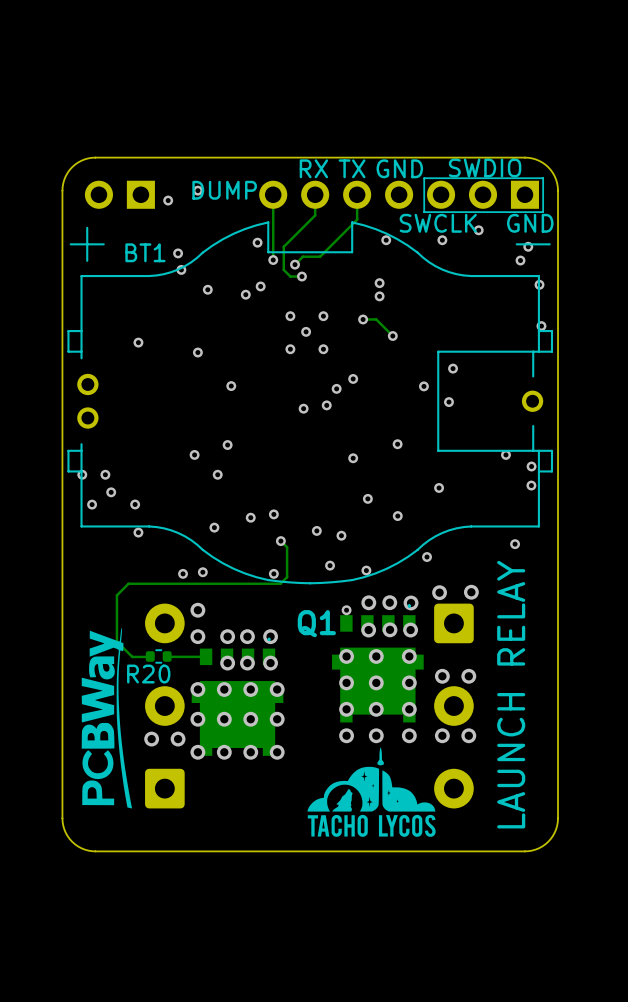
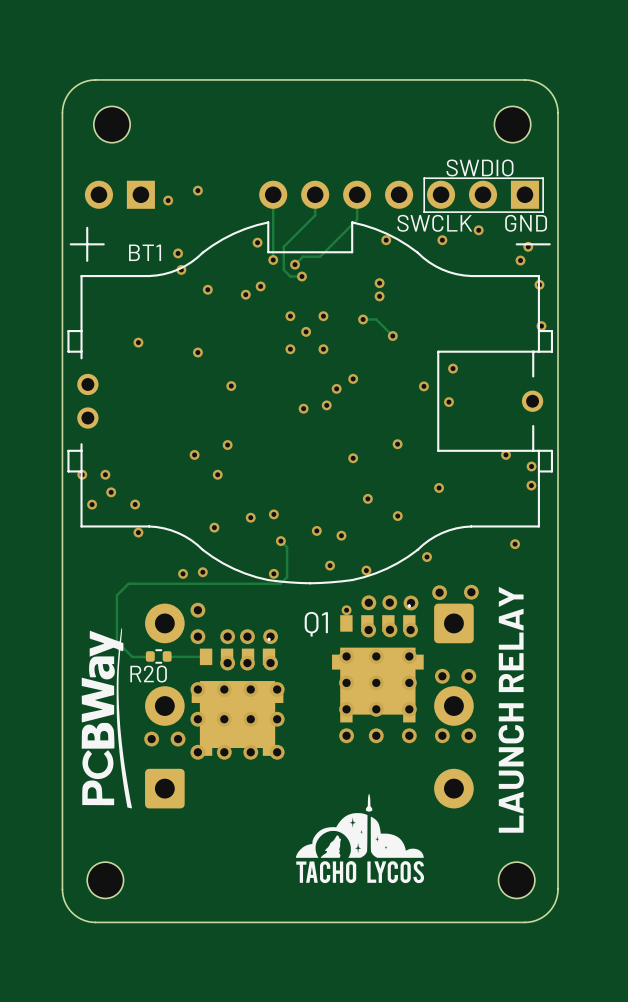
part: none -> (112, 124)
part: none -> (512, 124)
text: RX (313, 168) -> none
text: TX (352, 168) -> none
text: GND (399, 168) -> none
text: DUMP (224, 190) -> none
board edge: (558, 190) (554, 176) (548, 167) (535, 159) (524, 157) (91, 157) (81, 160) (72, 167) (65, 176) (62, 190) -> (558, 190) (558, 113) (556, 102) (550, 92) (542, 85) (524, 79) (88, 80) (72, 89) (63, 105) (62, 190)
drawing position: (371, 792) -> (359, 838)
board edge: (558, 818) (554, 832) (548, 841) (535, 849) (524, 851) (91, 851) (81, 848) (72, 841) (65, 832) (62, 818) -> (558, 818) (558, 889) (556, 900) (545, 915) (535, 920) (524, 922) (88, 921) (72, 912) (63, 896) (62, 818)
part: none -> (105, 880)
part: none -> (516, 880)

